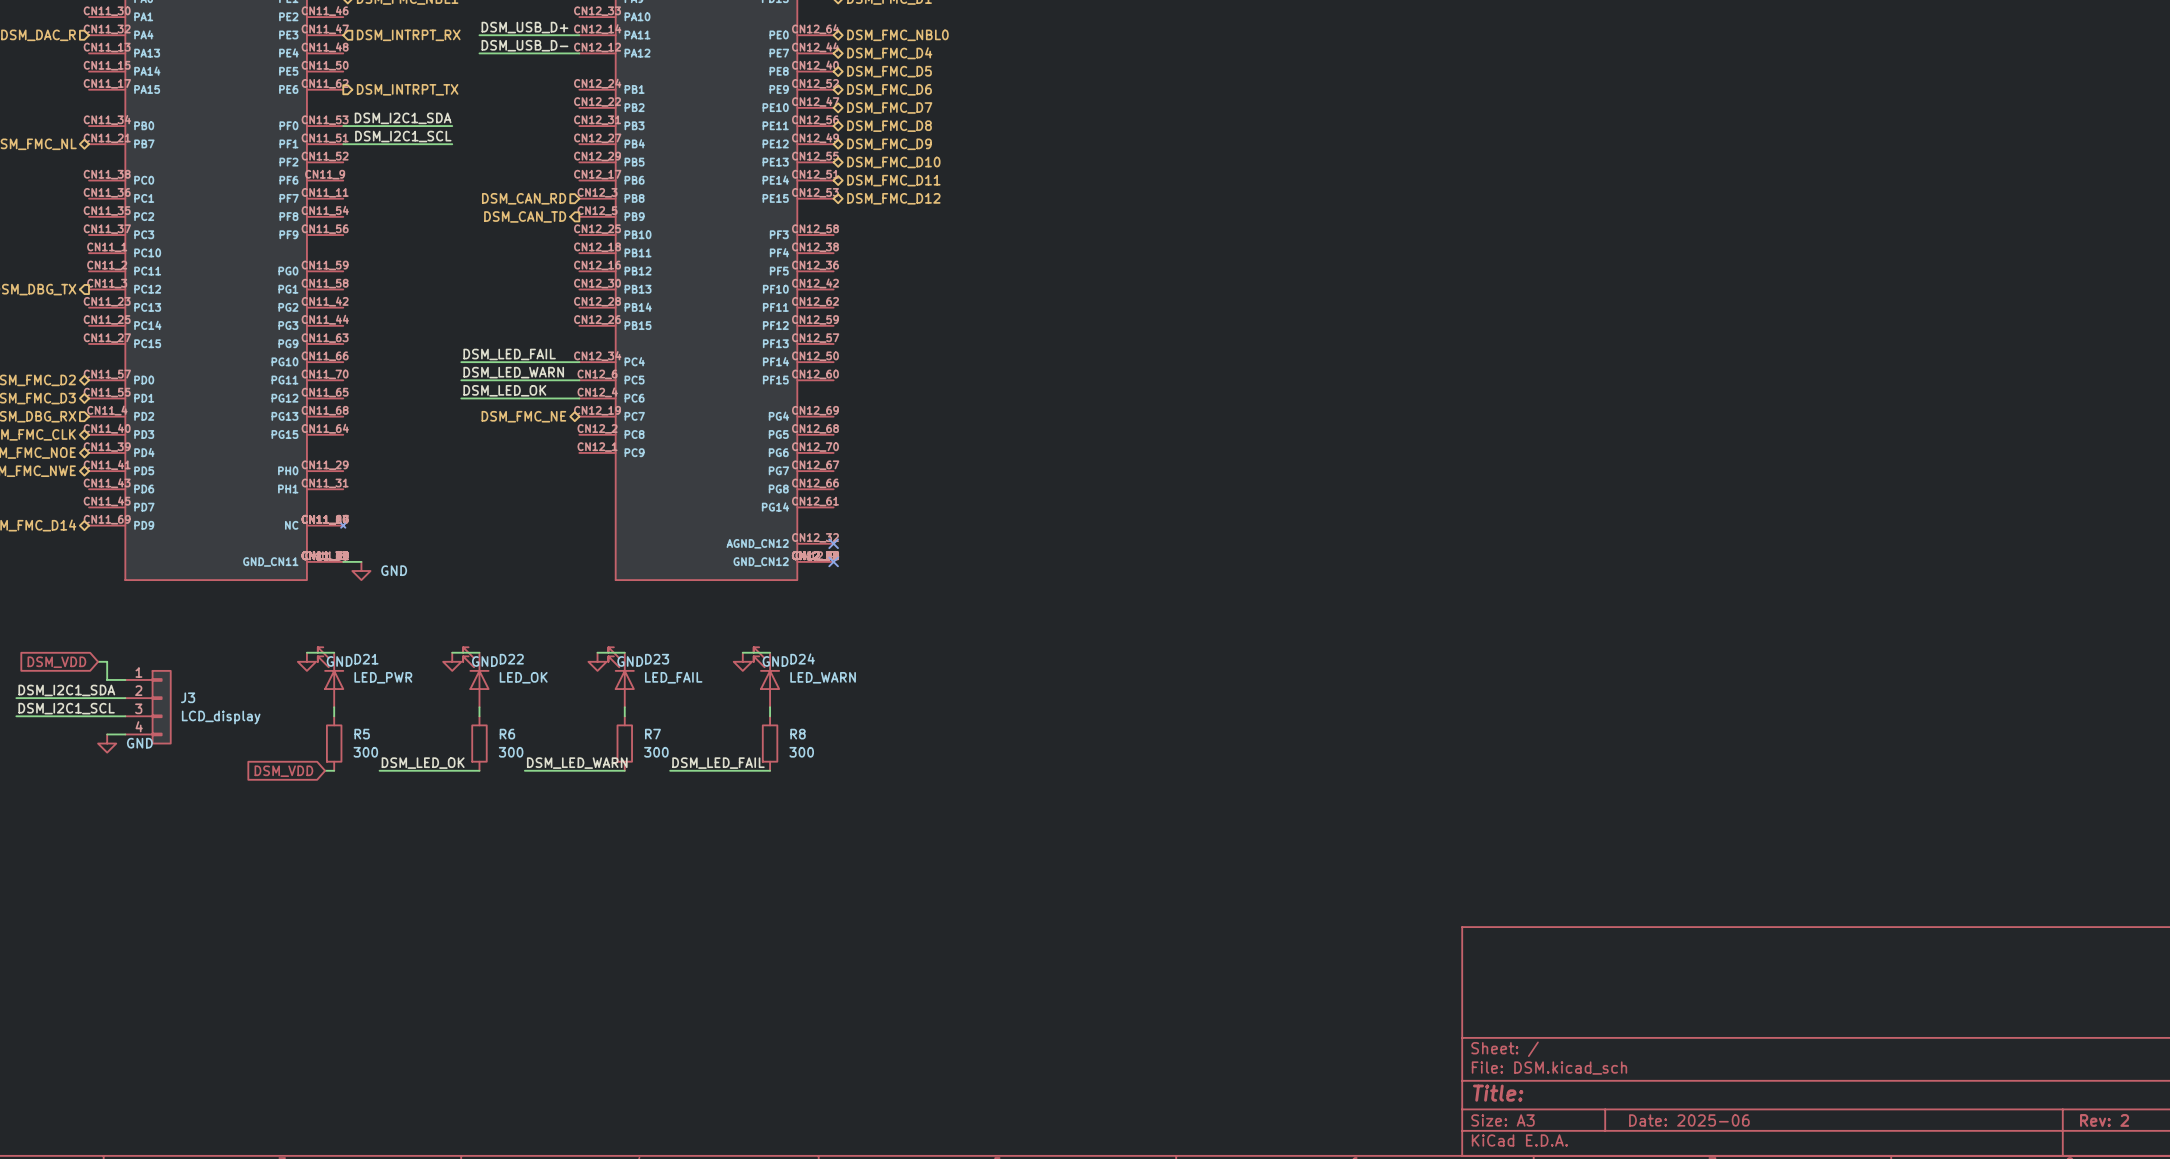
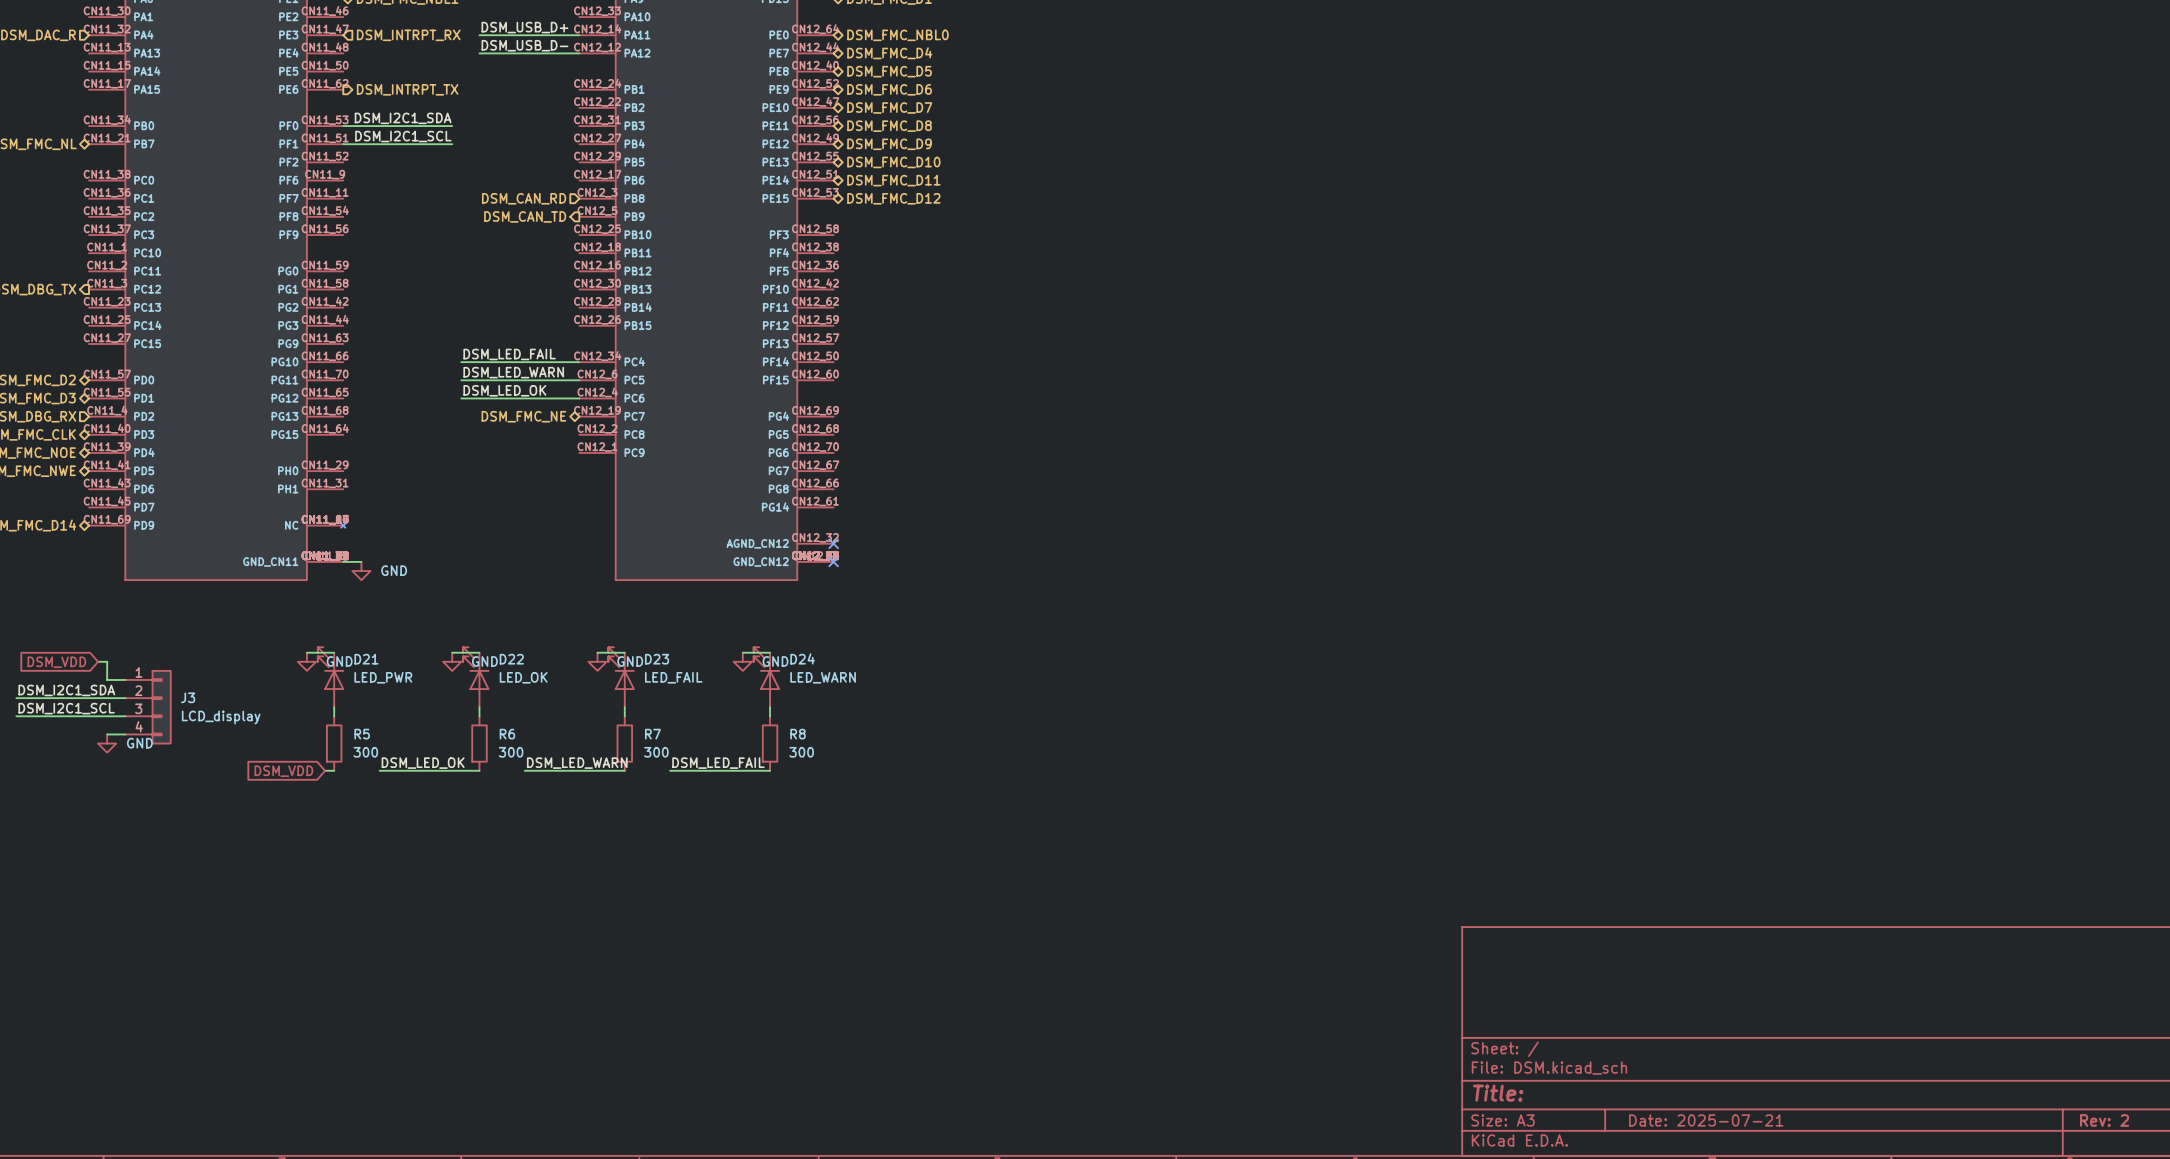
title block: Date: 2025-06 (1689, 1120) -> Date: 2025-07-21 (1706, 1120)

